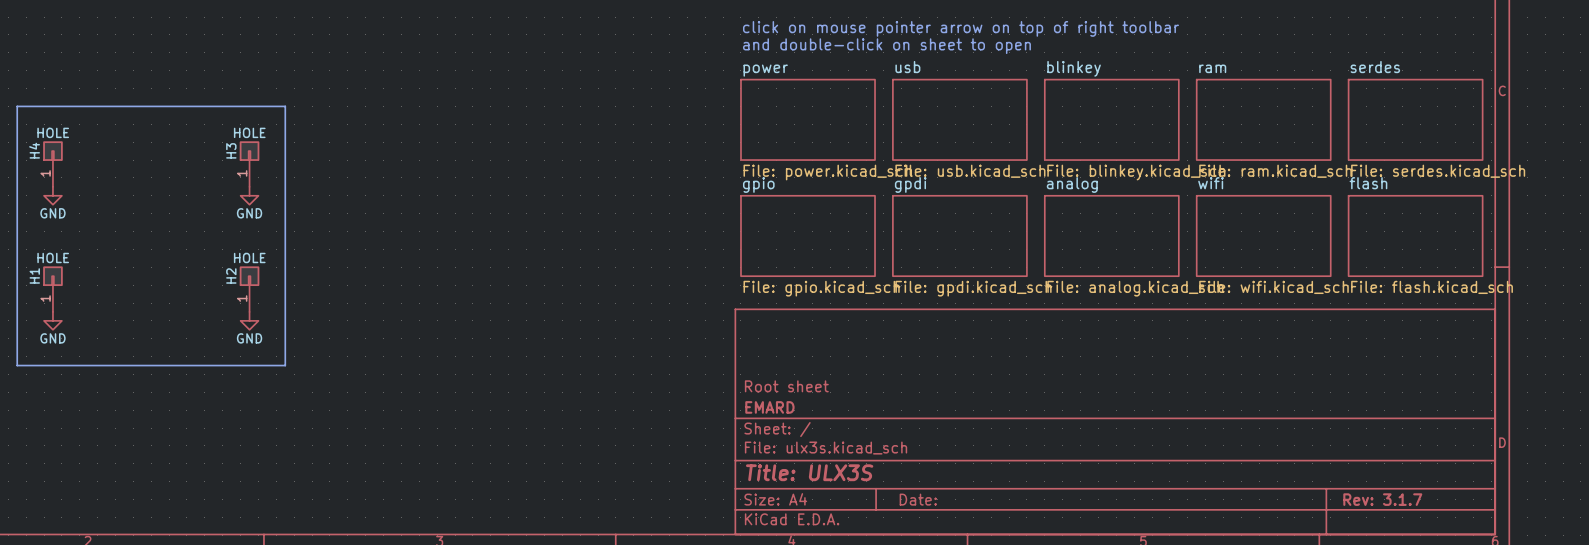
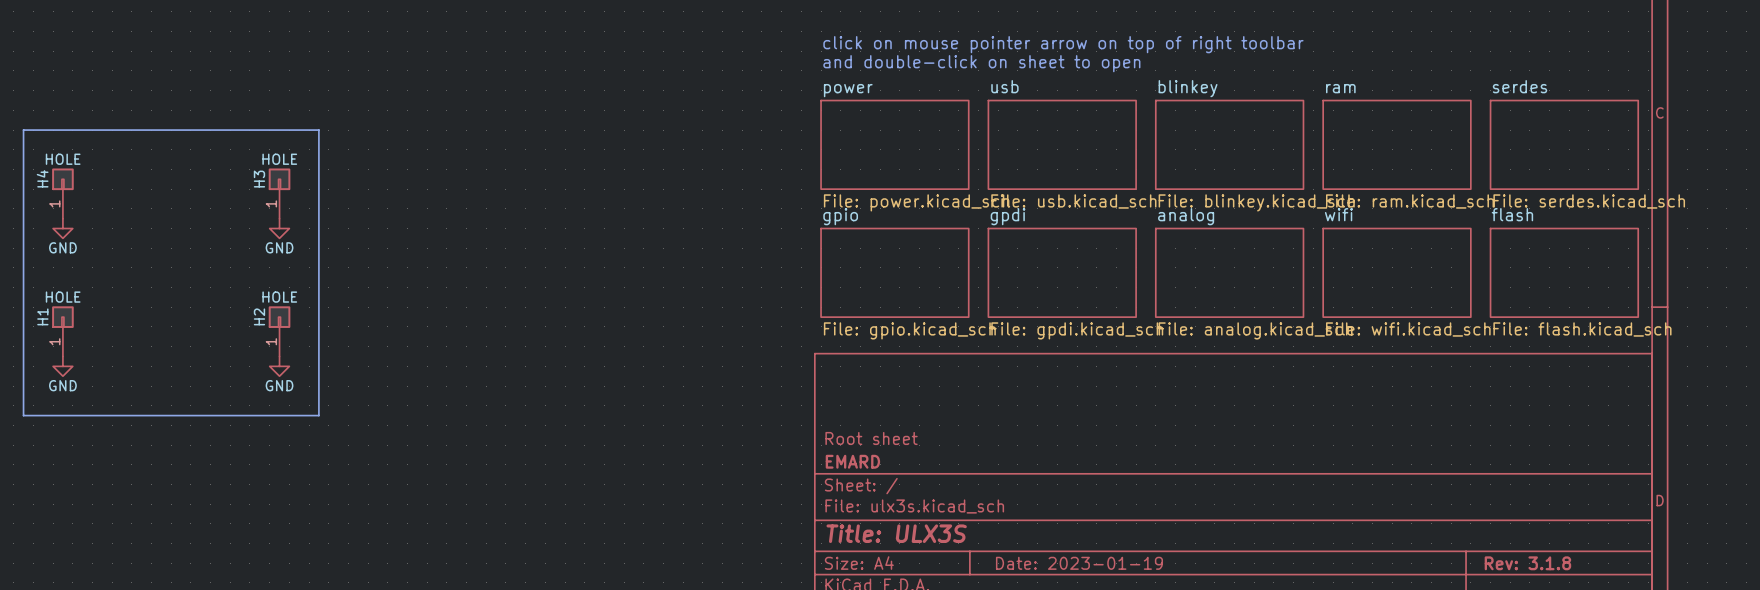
title block: Date: (918, 499) -> Date: 2023-01-19 (1079, 563)
title block: Rev: 3.1.7 (1382, 499) -> Rev: 3.1.8 (1527, 563)

